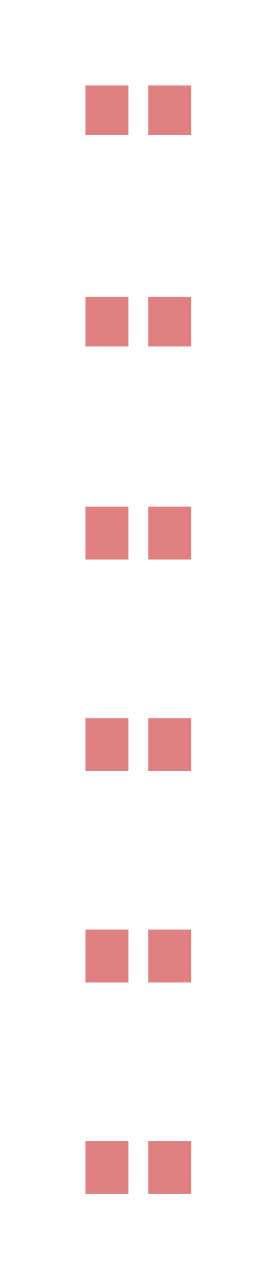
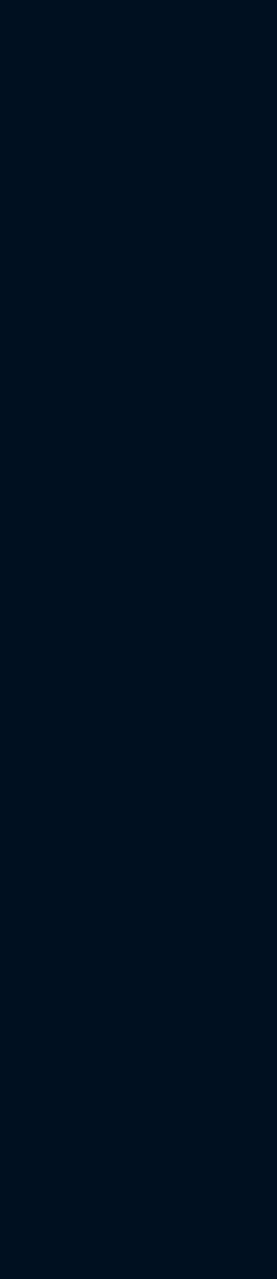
part: (138, 110) -> none
part: (138, 321) -> none
part: (138, 533) -> none
part: (138, 744) -> none
part: (138, 956) -> none
part: (138, 1167) -> none

